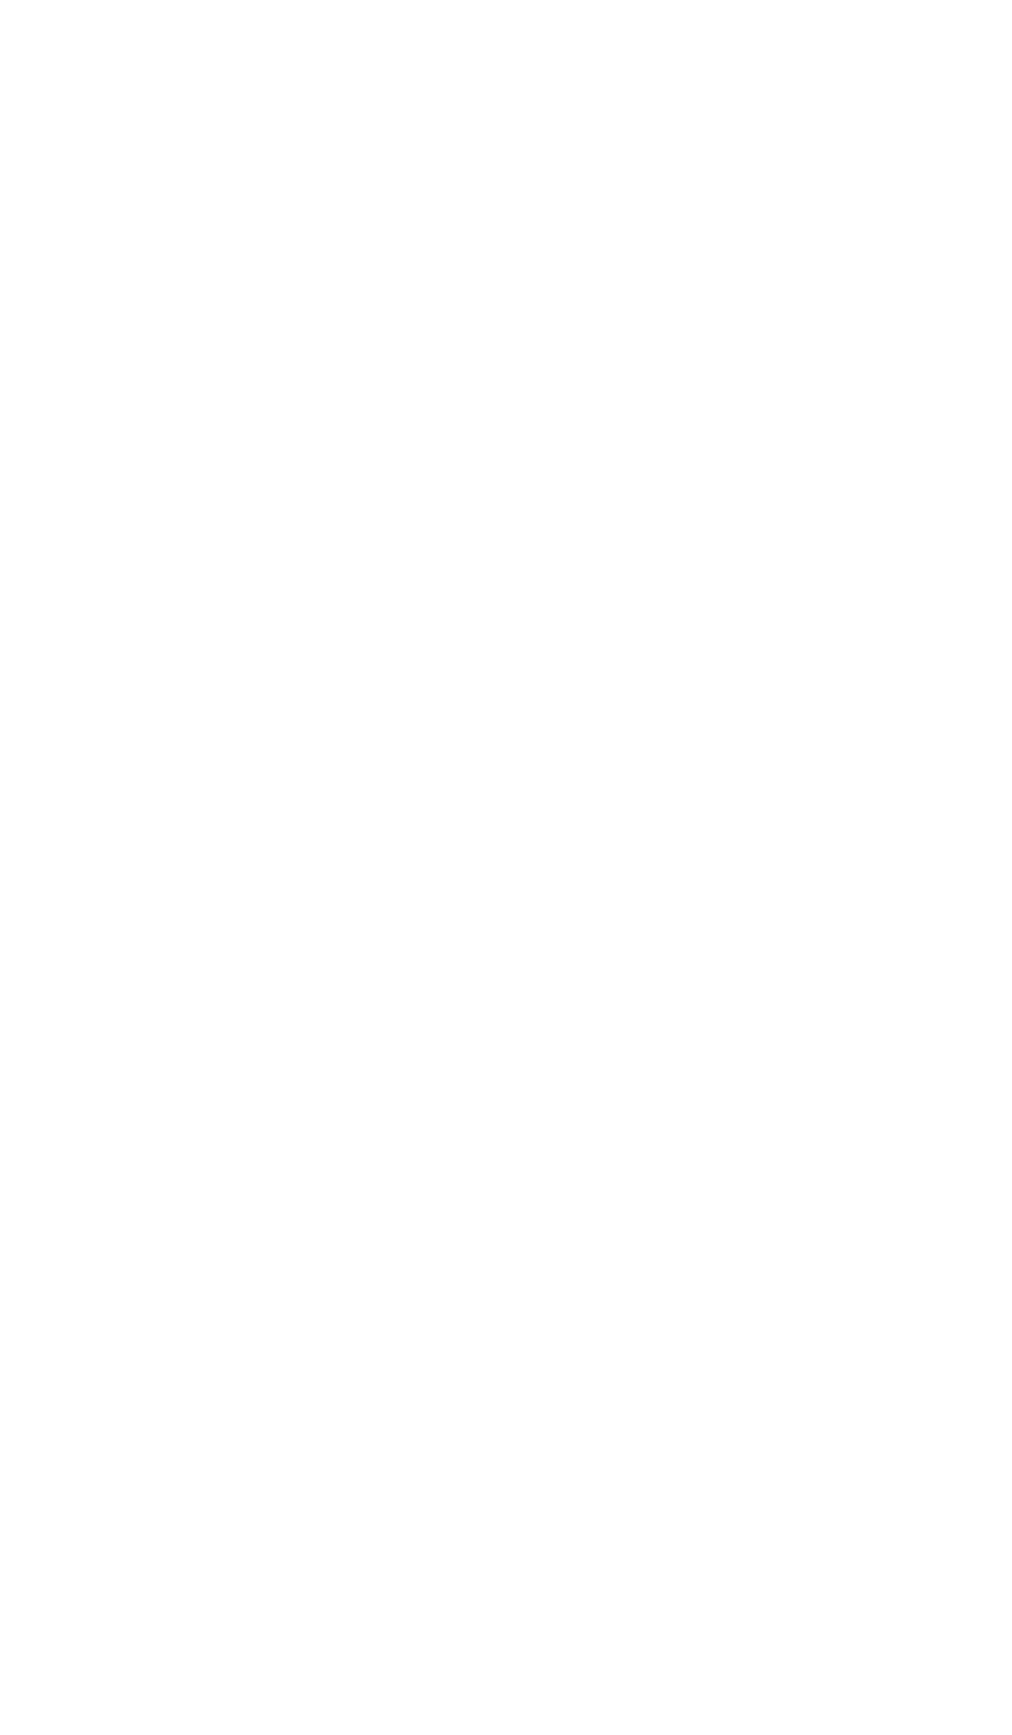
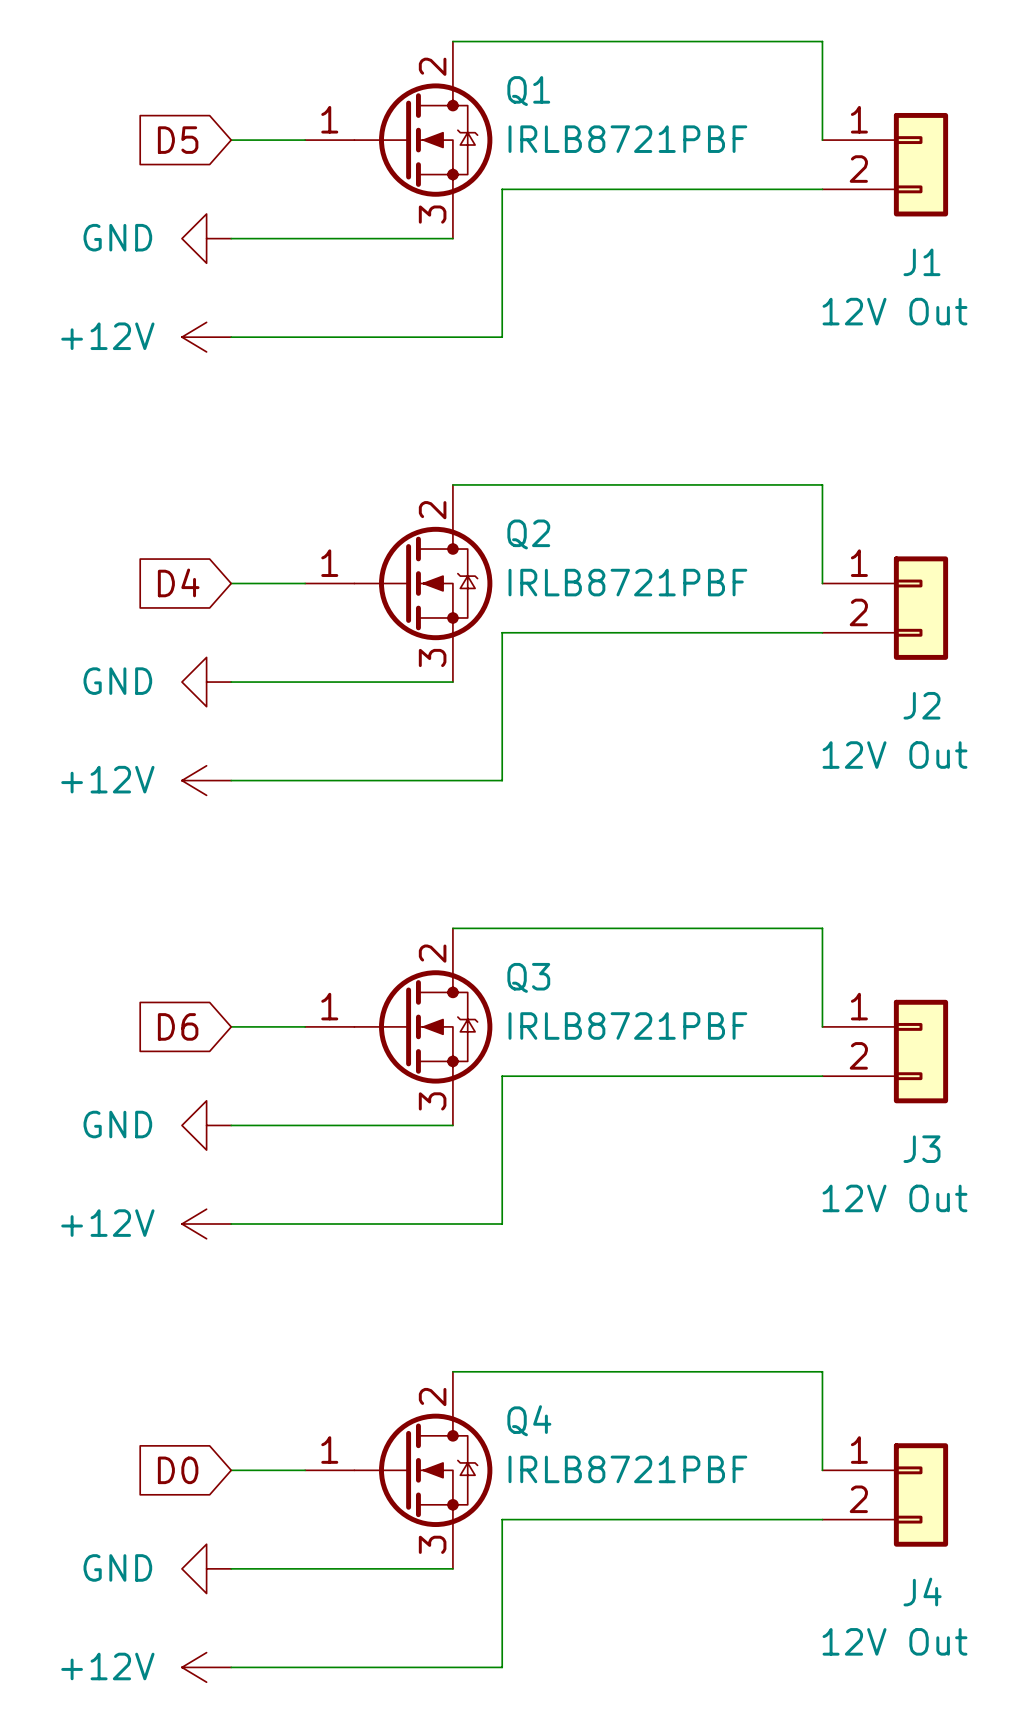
wire: none -> (452, 41) (822, 41) (822, 140)
global label: none -> D5 (178, 140)
wire: none -> (231, 140) (305, 140)
Q1: none -> IRLB8721PBF (398, 140)
J1: none -> 12V Out (885, 164)
wire: none -> (822, 189) (502, 189) (502, 337) (231, 337)
power symbol: none -> GND (206, 238)
wire: none -> (231, 238) (452, 238)
power symbol: none -> +12V (206, 337)
wire: none -> (452, 484) (822, 484) (822, 583)
global label: none -> D4 (178, 582)
wire: none -> (231, 583) (305, 583)
Q2: none -> IRLB8721PBF (398, 583)
J2: none -> 12V Out (885, 608)
wire: none -> (822, 632) (502, 632) (502, 780) (231, 780)
power symbol: none -> GND (206, 682)
wire: none -> (231, 682) (452, 682)
power symbol: none -> +12V (206, 780)
wire: none -> (452, 928) (822, 928) (822, 1026)
global label: none -> D6 (178, 1026)
wire: none -> (231, 1026) (305, 1026)
Q3: none -> IRLB8721PBF (398, 1026)
J3: none -> 12V Out (885, 1051)
wire: none -> (822, 1076) (502, 1076) (502, 1223) (231, 1223)
power symbol: none -> GND (206, 1125)
wire: none -> (231, 1125) (452, 1125)
power symbol: none -> +12V (206, 1223)
wire: none -> (452, 1371) (822, 1371) (822, 1470)
global label: none -> D0 (178, 1470)
wire: none -> (231, 1470) (305, 1470)
Q4: none -> IRLB8721PBF (398, 1470)
J4: none -> 12V Out (885, 1494)
wire: none -> (822, 1519) (502, 1519) (502, 1667) (231, 1667)
power symbol: none -> GND (206, 1568)
wire: none -> (231, 1568) (452, 1568)
power symbol: none -> +12V (206, 1667)

